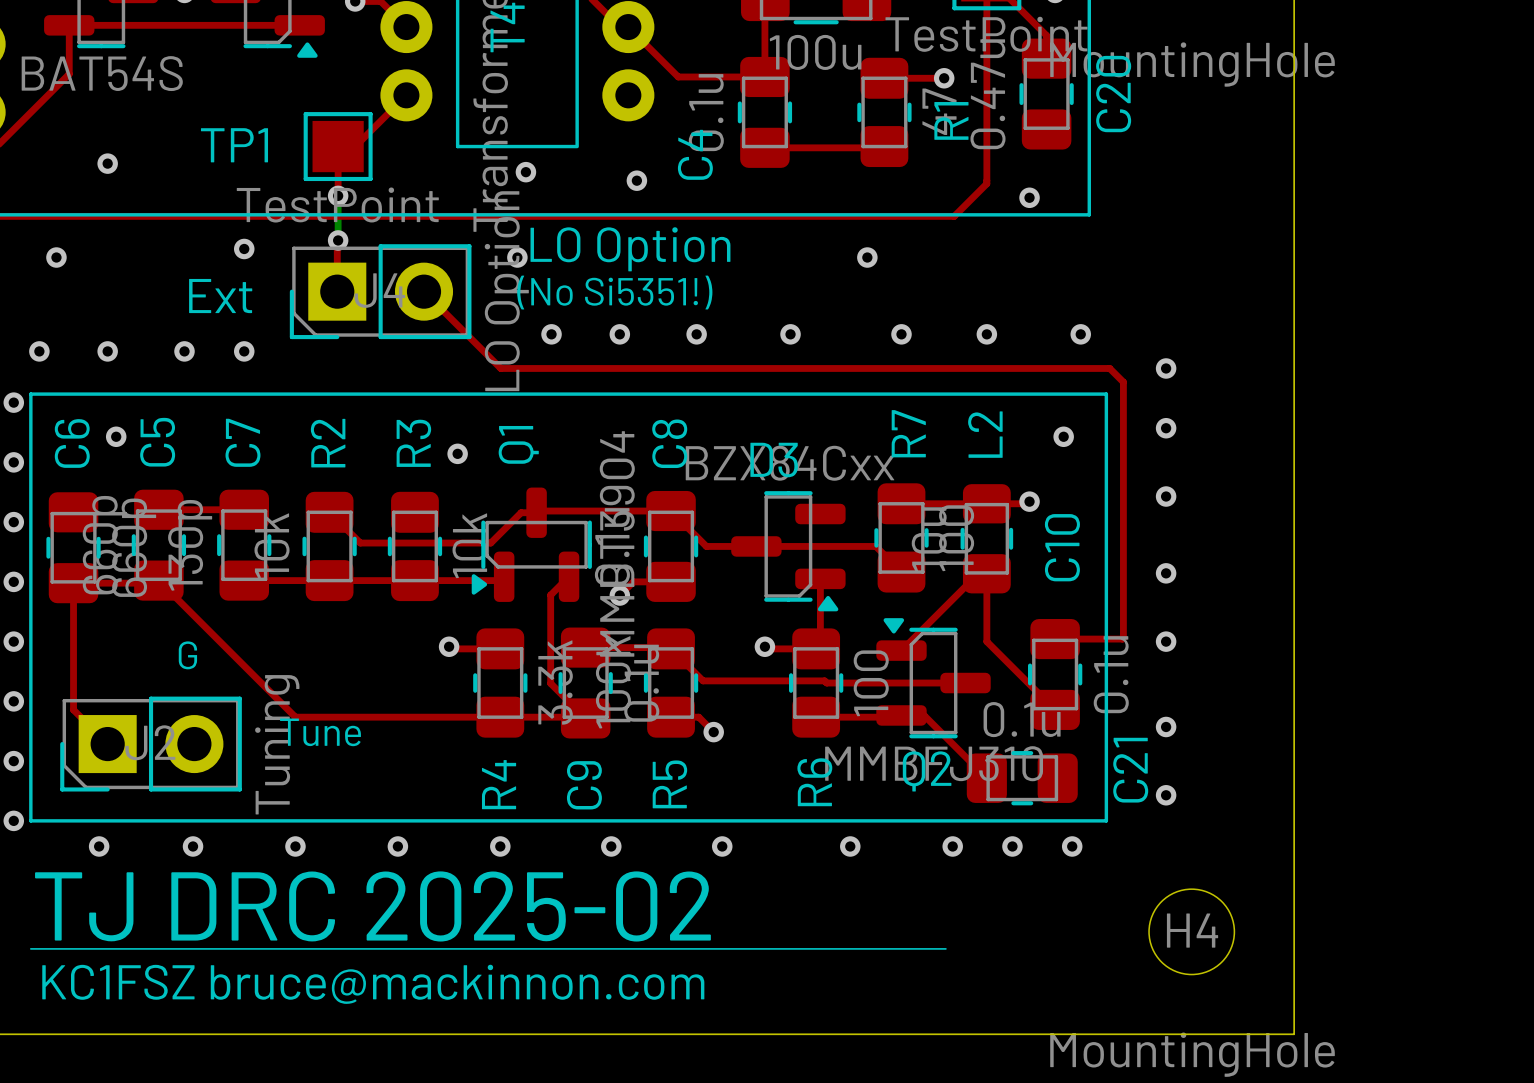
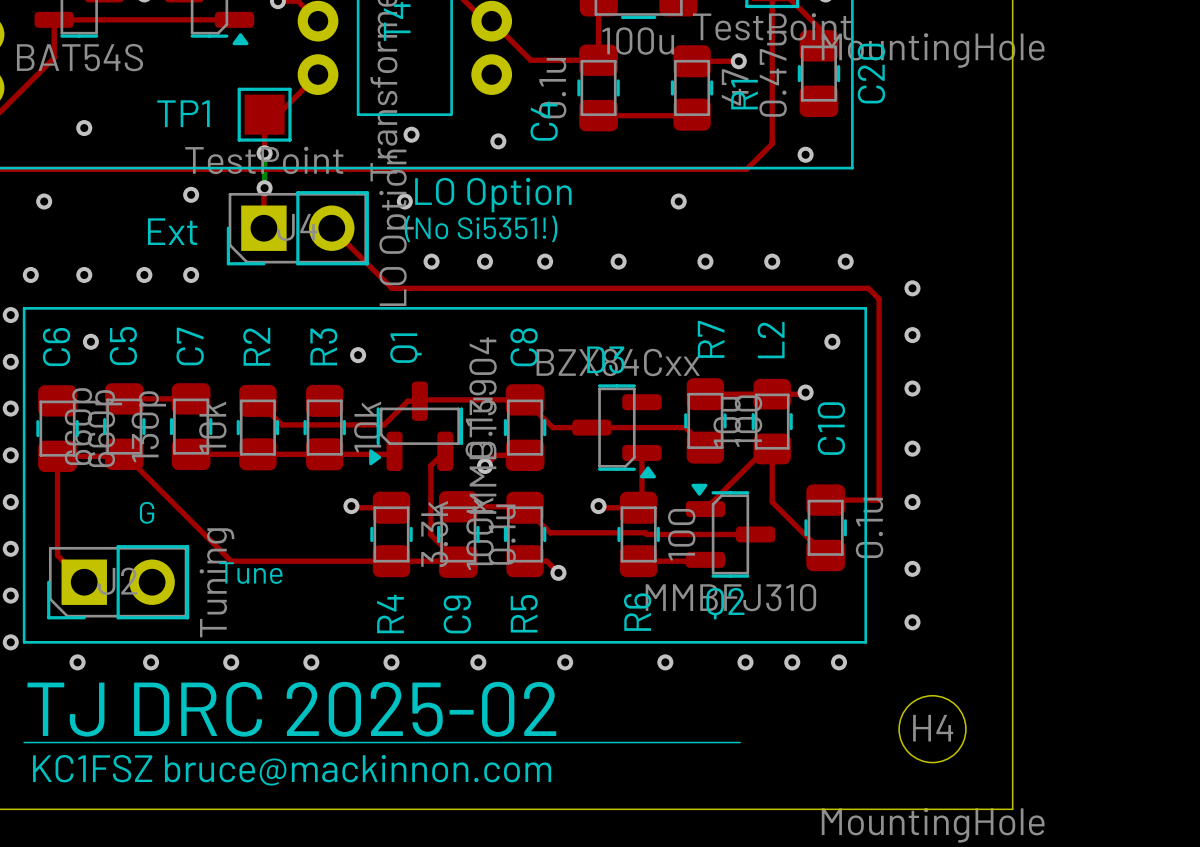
top track: (901, 715) (924, 715) (986, 778) -> none
C21: 0.1u (1022, 778) -> none

